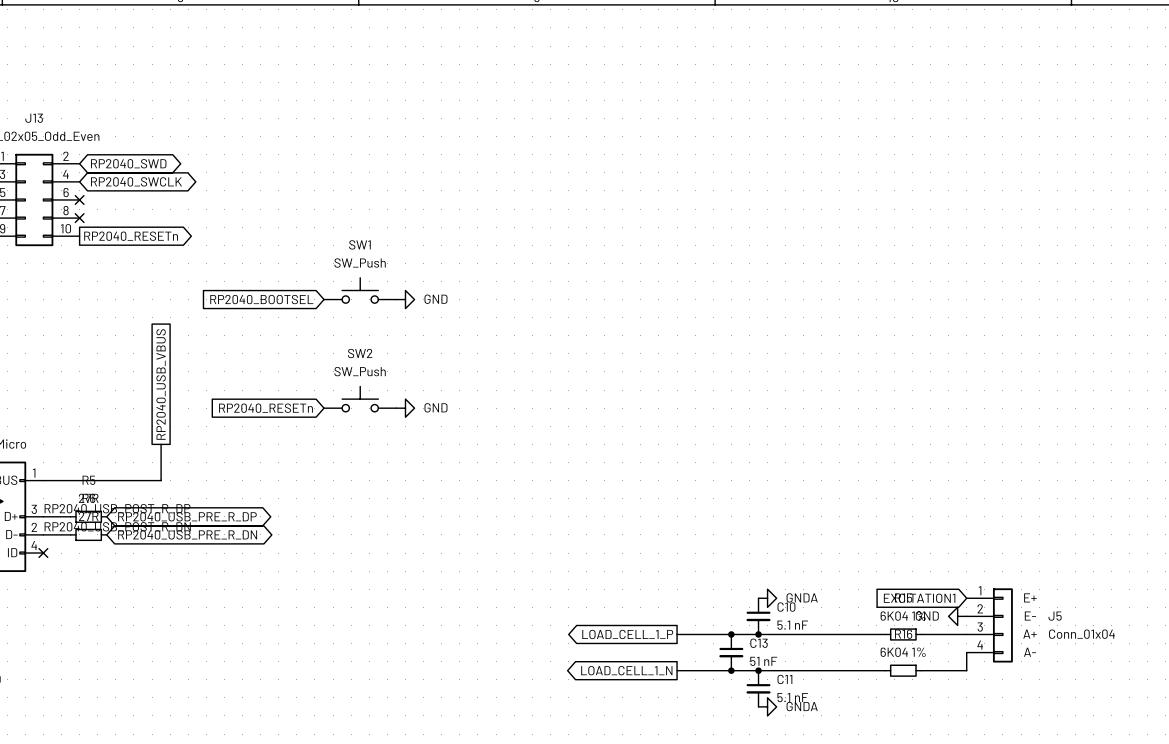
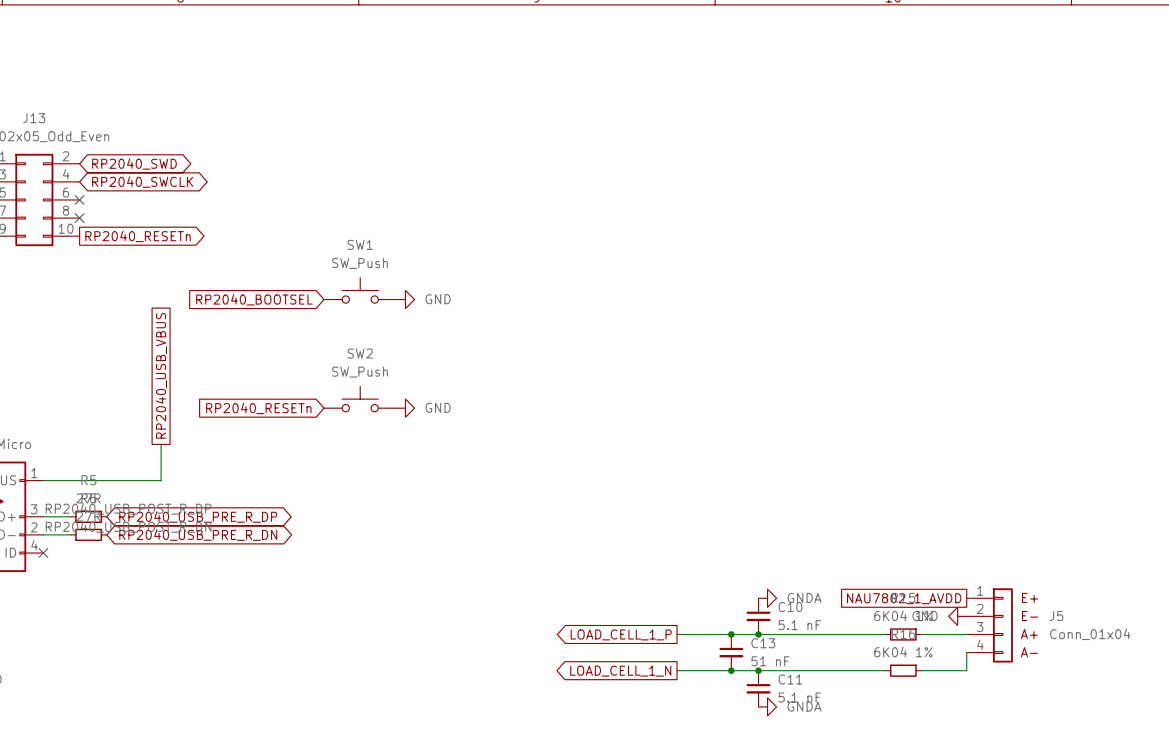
global label shape: input (919, 598) -> passive (904, 598)
global label: EXCITATION1 (919, 598) -> NAU7802_1_AVDD (904, 598)

